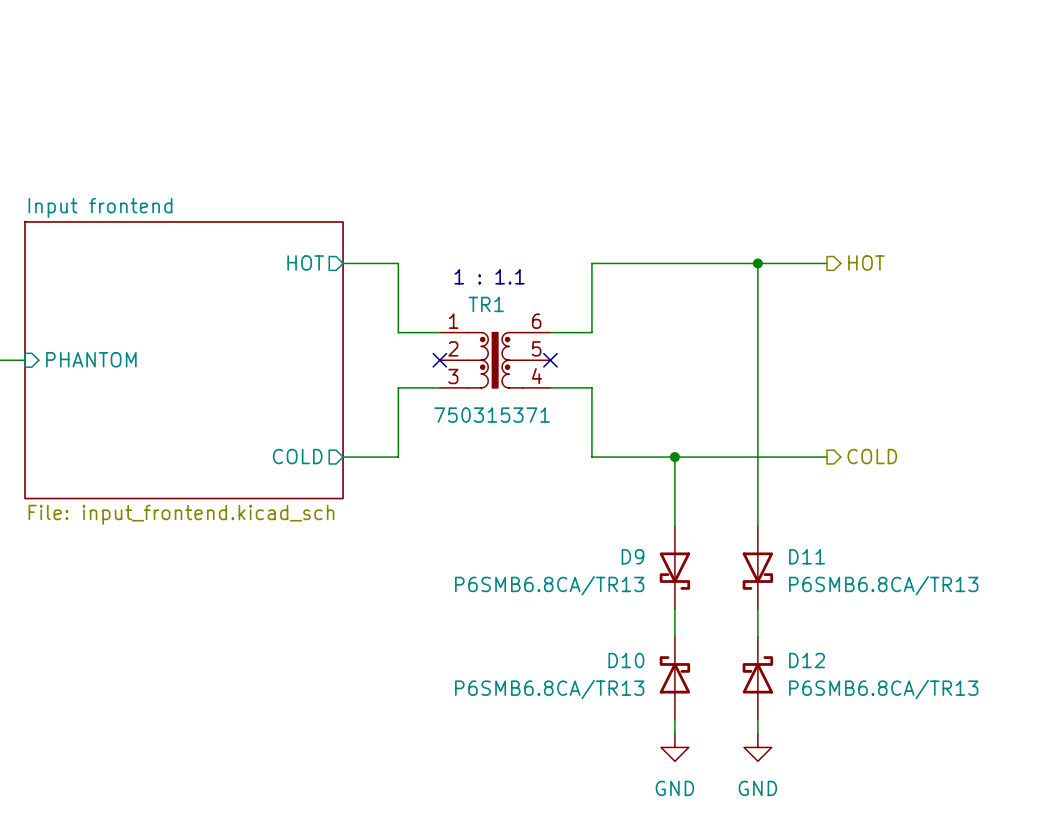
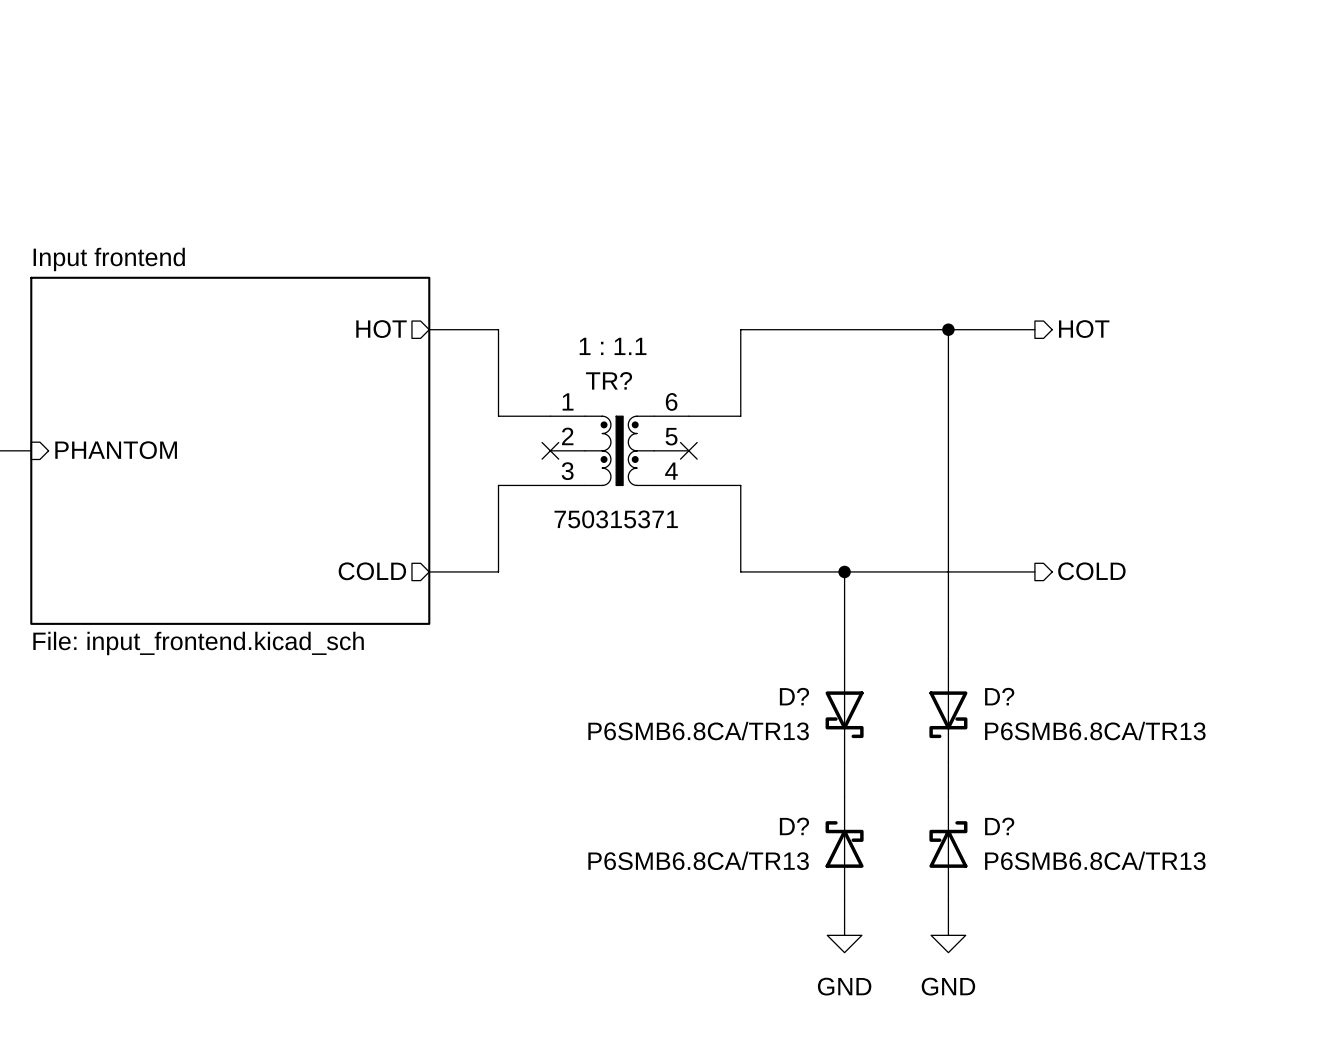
TR1 name: TR1 (486, 304) -> TR? (609, 380)
D9 name: D9 (632, 556) -> D? (794, 696)
D11 name: D11 (807, 556) -> D? (999, 696)
D10 name: D10 (626, 660) -> D? (794, 826)
D12 name: D12 (807, 660) -> D? (999, 826)

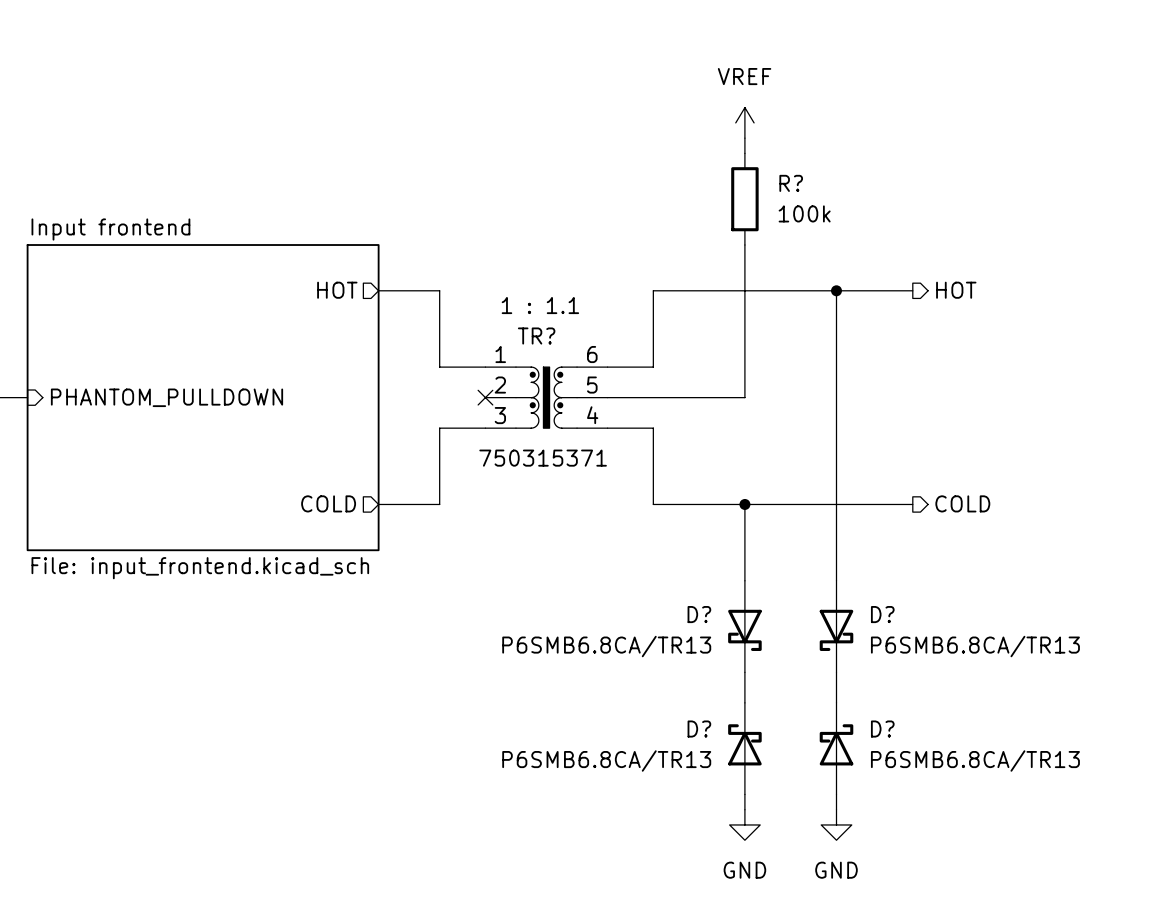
power symbol: none -> VREF (744, 122)
wire: none -> (744, 138) (744, 153)
R?: none -> 100k (744, 199)
wire: none -> (744, 245) (744, 397) (607, 397)
sheet pin: PHANTOM (116, 450) -> PHANTOM_PULLDOWN (167, 397)
no-connect mark: (688, 450) -> none

